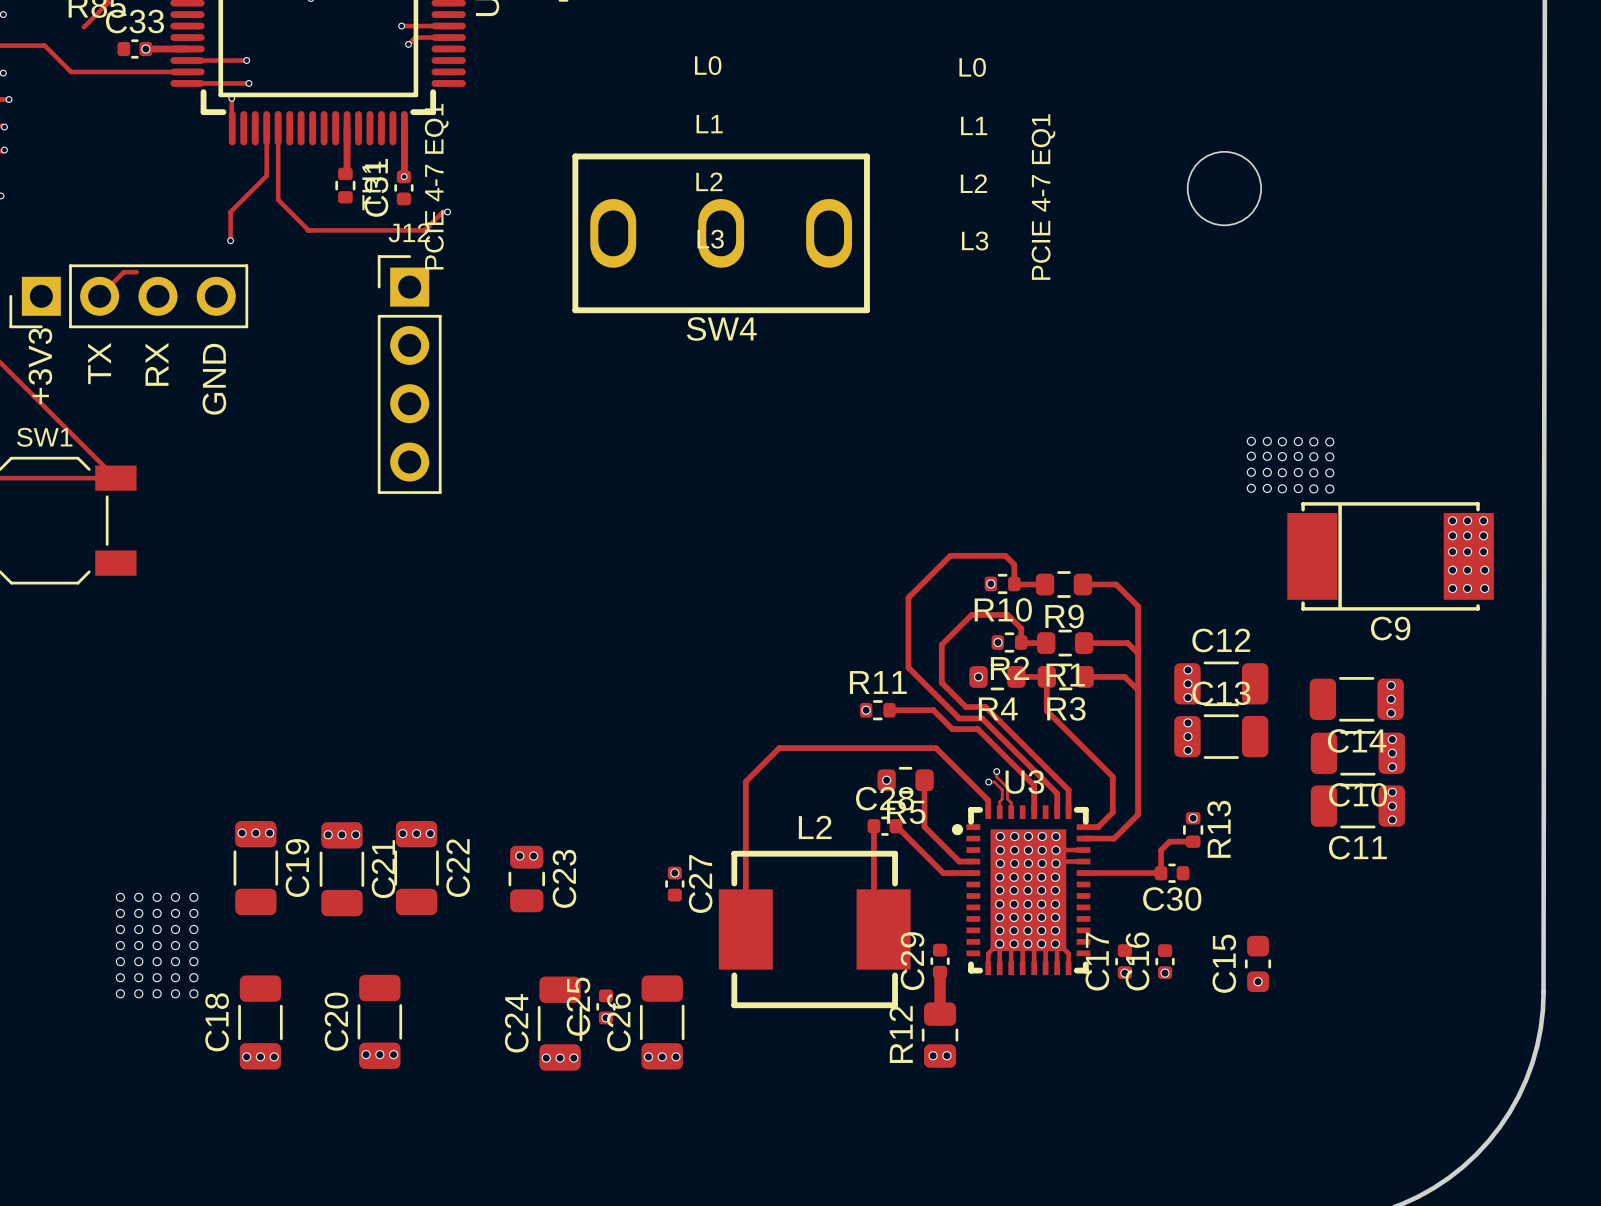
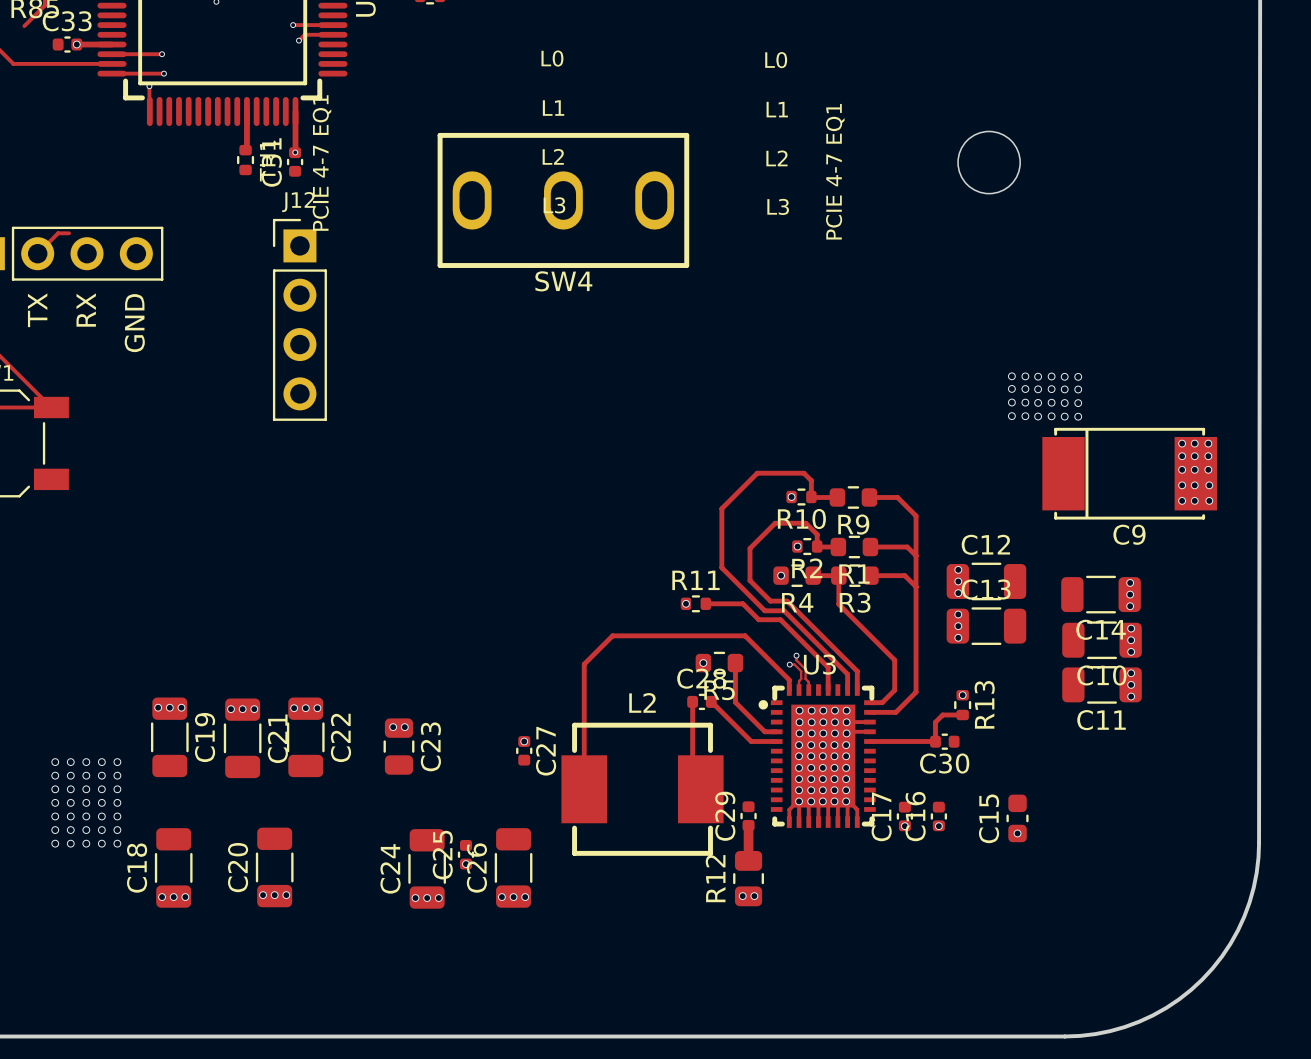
track: (266, 128) (266, 175) (230, 212) (230, 240) -> none
track: (278, 128) (278, 199) (308, 230) -> none
track: (447, 212) (442, 212) (424, 230) (307, 230) -> none
via: (447, 212) -> none
via: (230, 240) -> none

